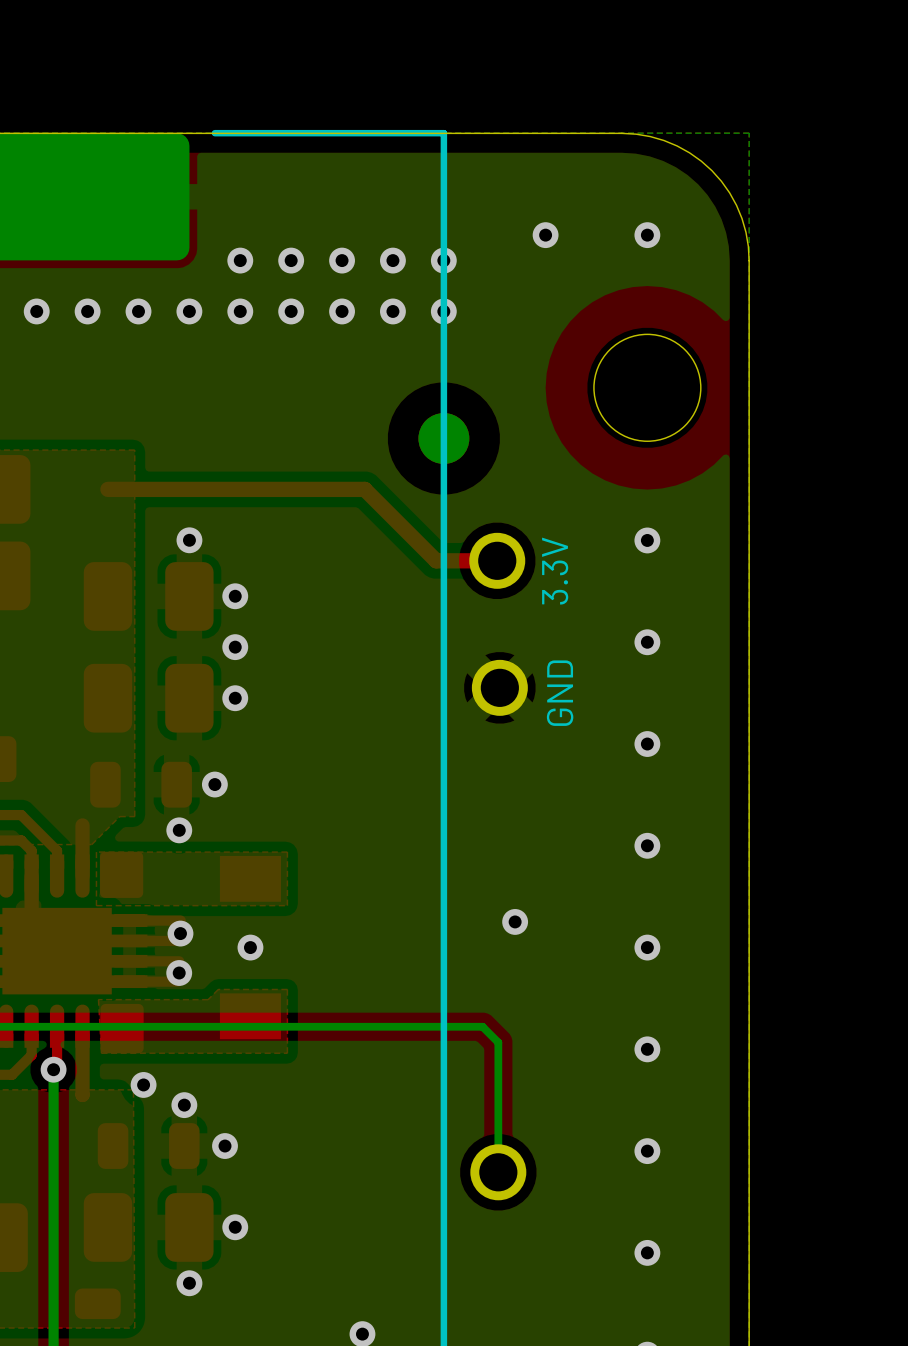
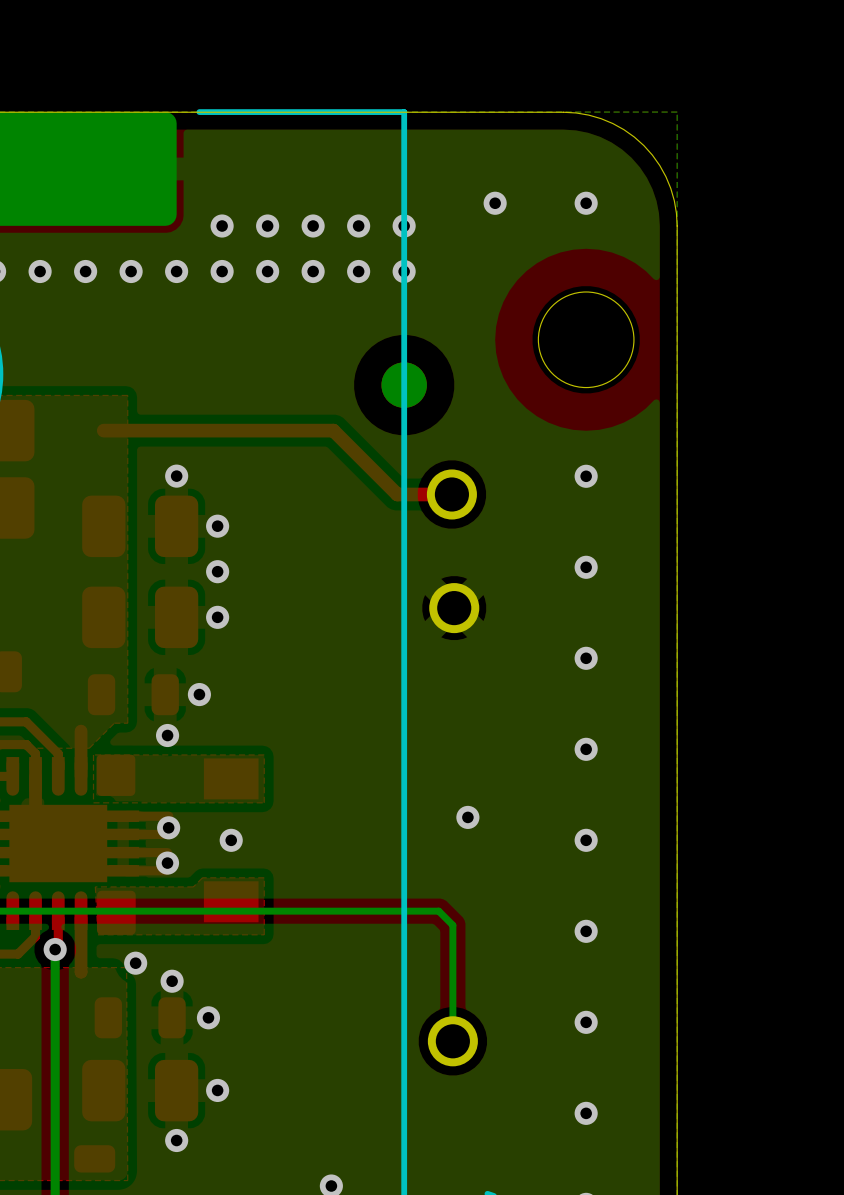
text: 3.3V (555, 571) -> none
text: GND (560, 693) -> none

